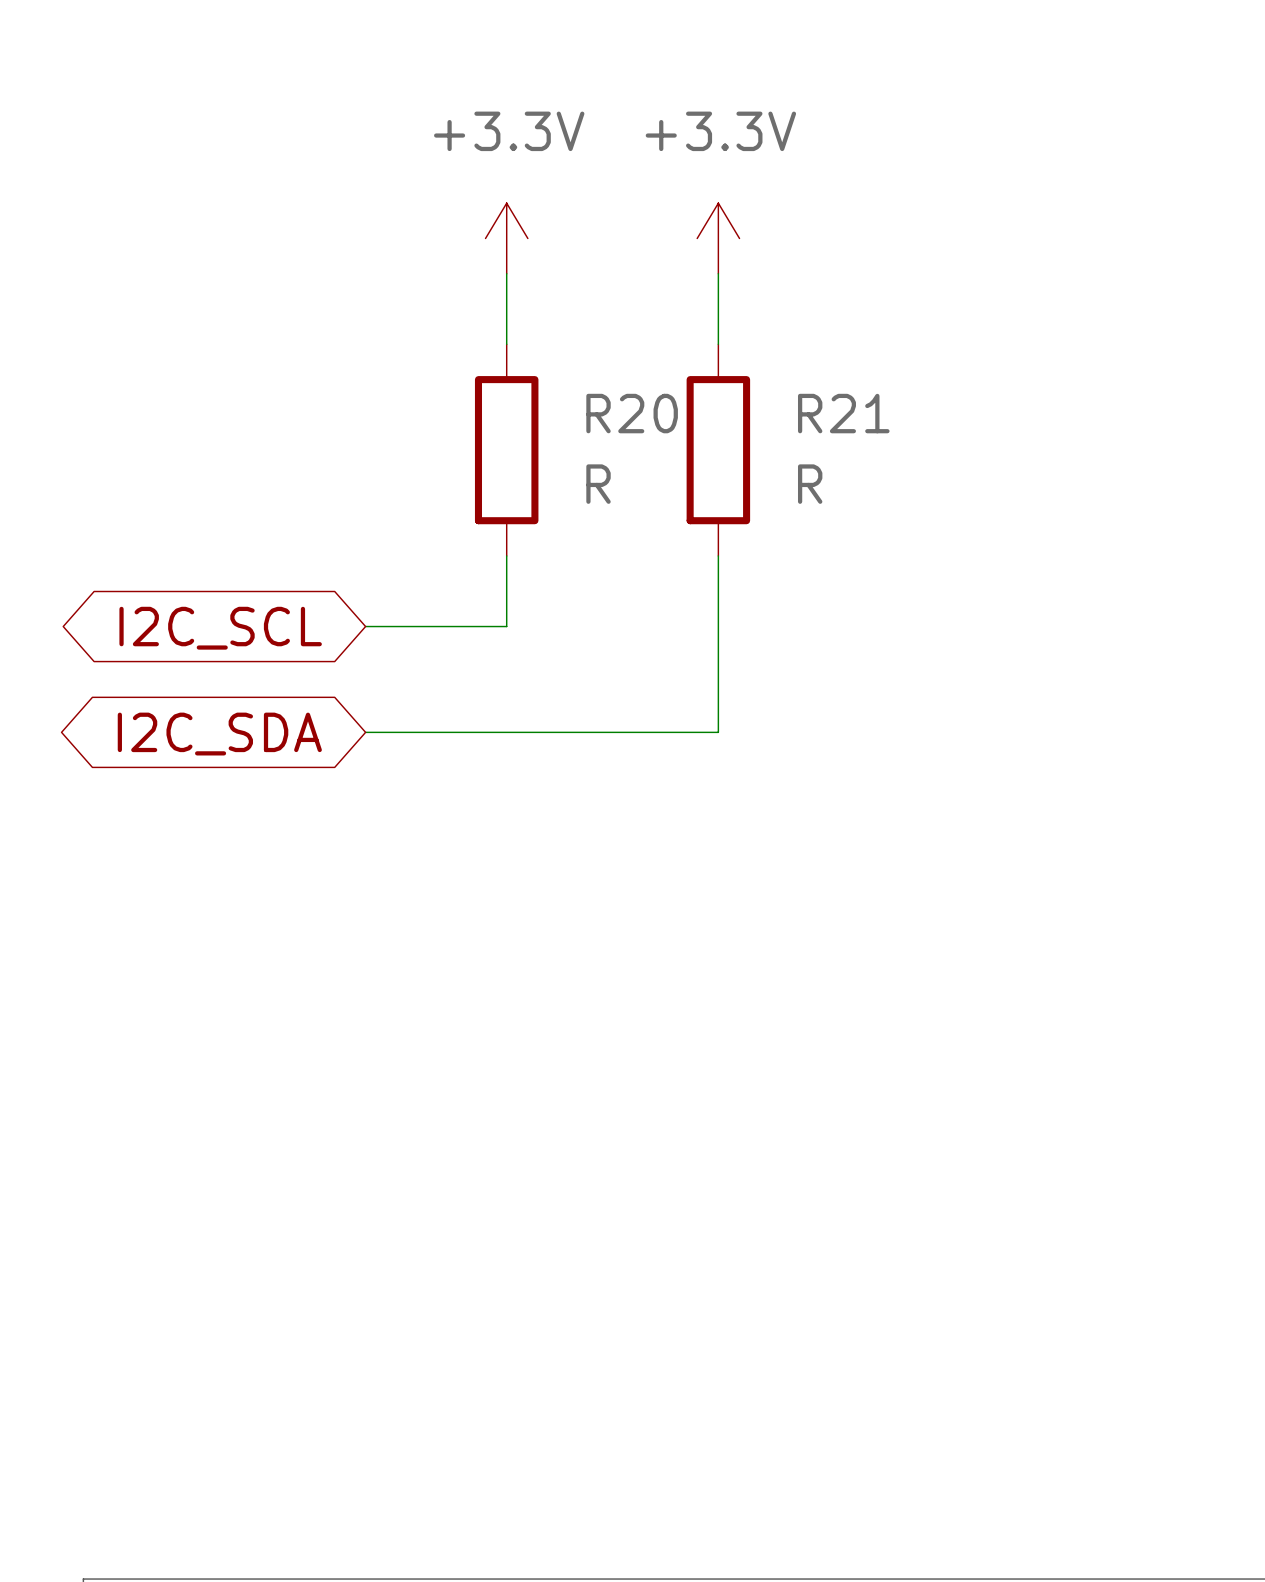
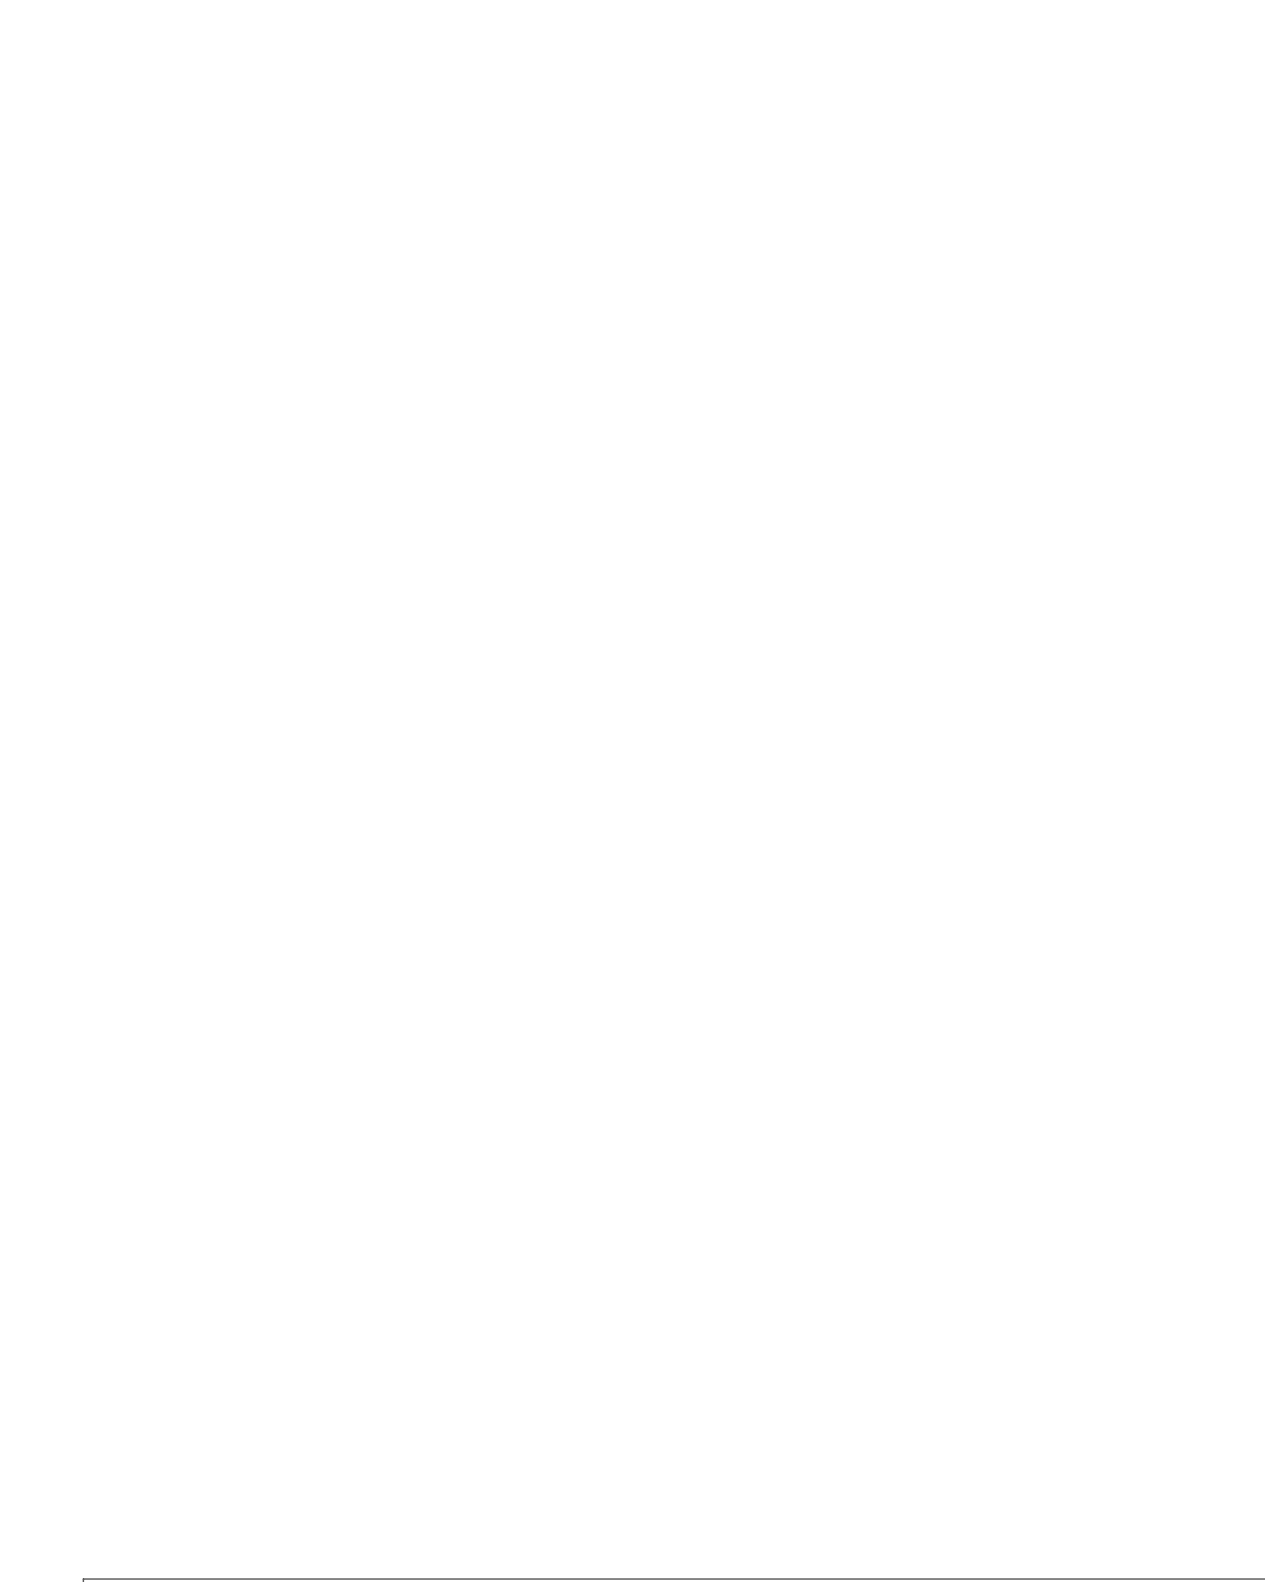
power symbol: +3.3V (506, 238) -> none
power symbol: +3.3V (718, 238) -> none
wire: (506, 273) (506, 344) -> none
wire: (718, 273) (718, 344) -> none
R20: R (506, 450) -> none
R21: R (718, 450) -> none
wire: (506, 555) (506, 626) (365, 626) -> none
wire: (718, 555) (718, 732) (365, 732) -> none
global label: I2C_SCL (220, 628) -> none
global label: I2C_SDA (219, 734) -> none

